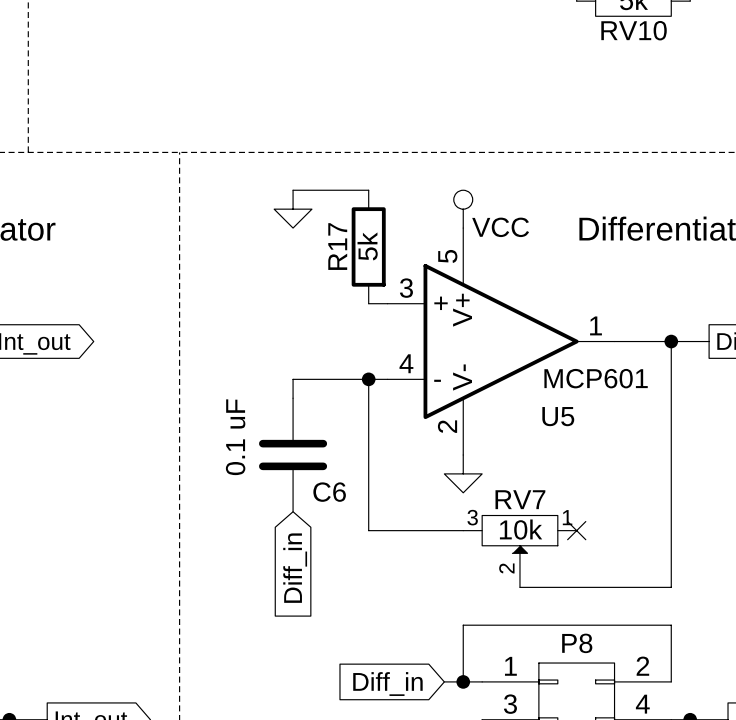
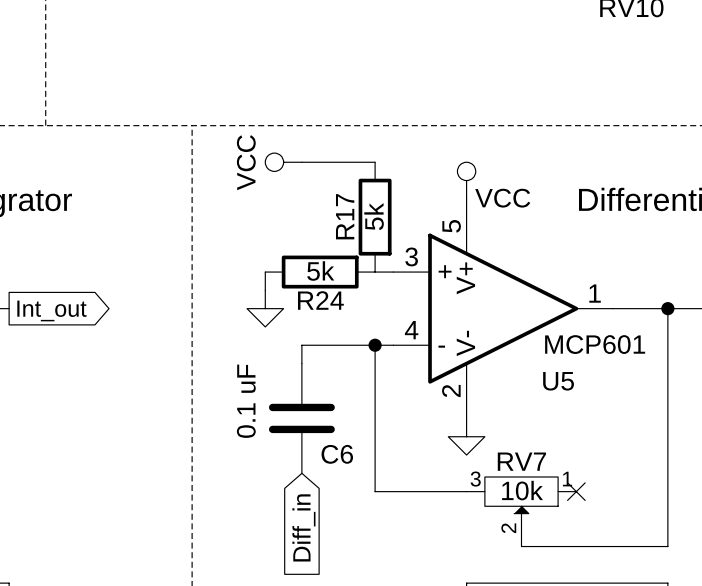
power symbol: none -> VCC (283, 162)
power symbol position: (293, 209) -> (265, 308)
wire: none -> (265, 272) (265, 290)
R24: none -> 5k (320, 272)

